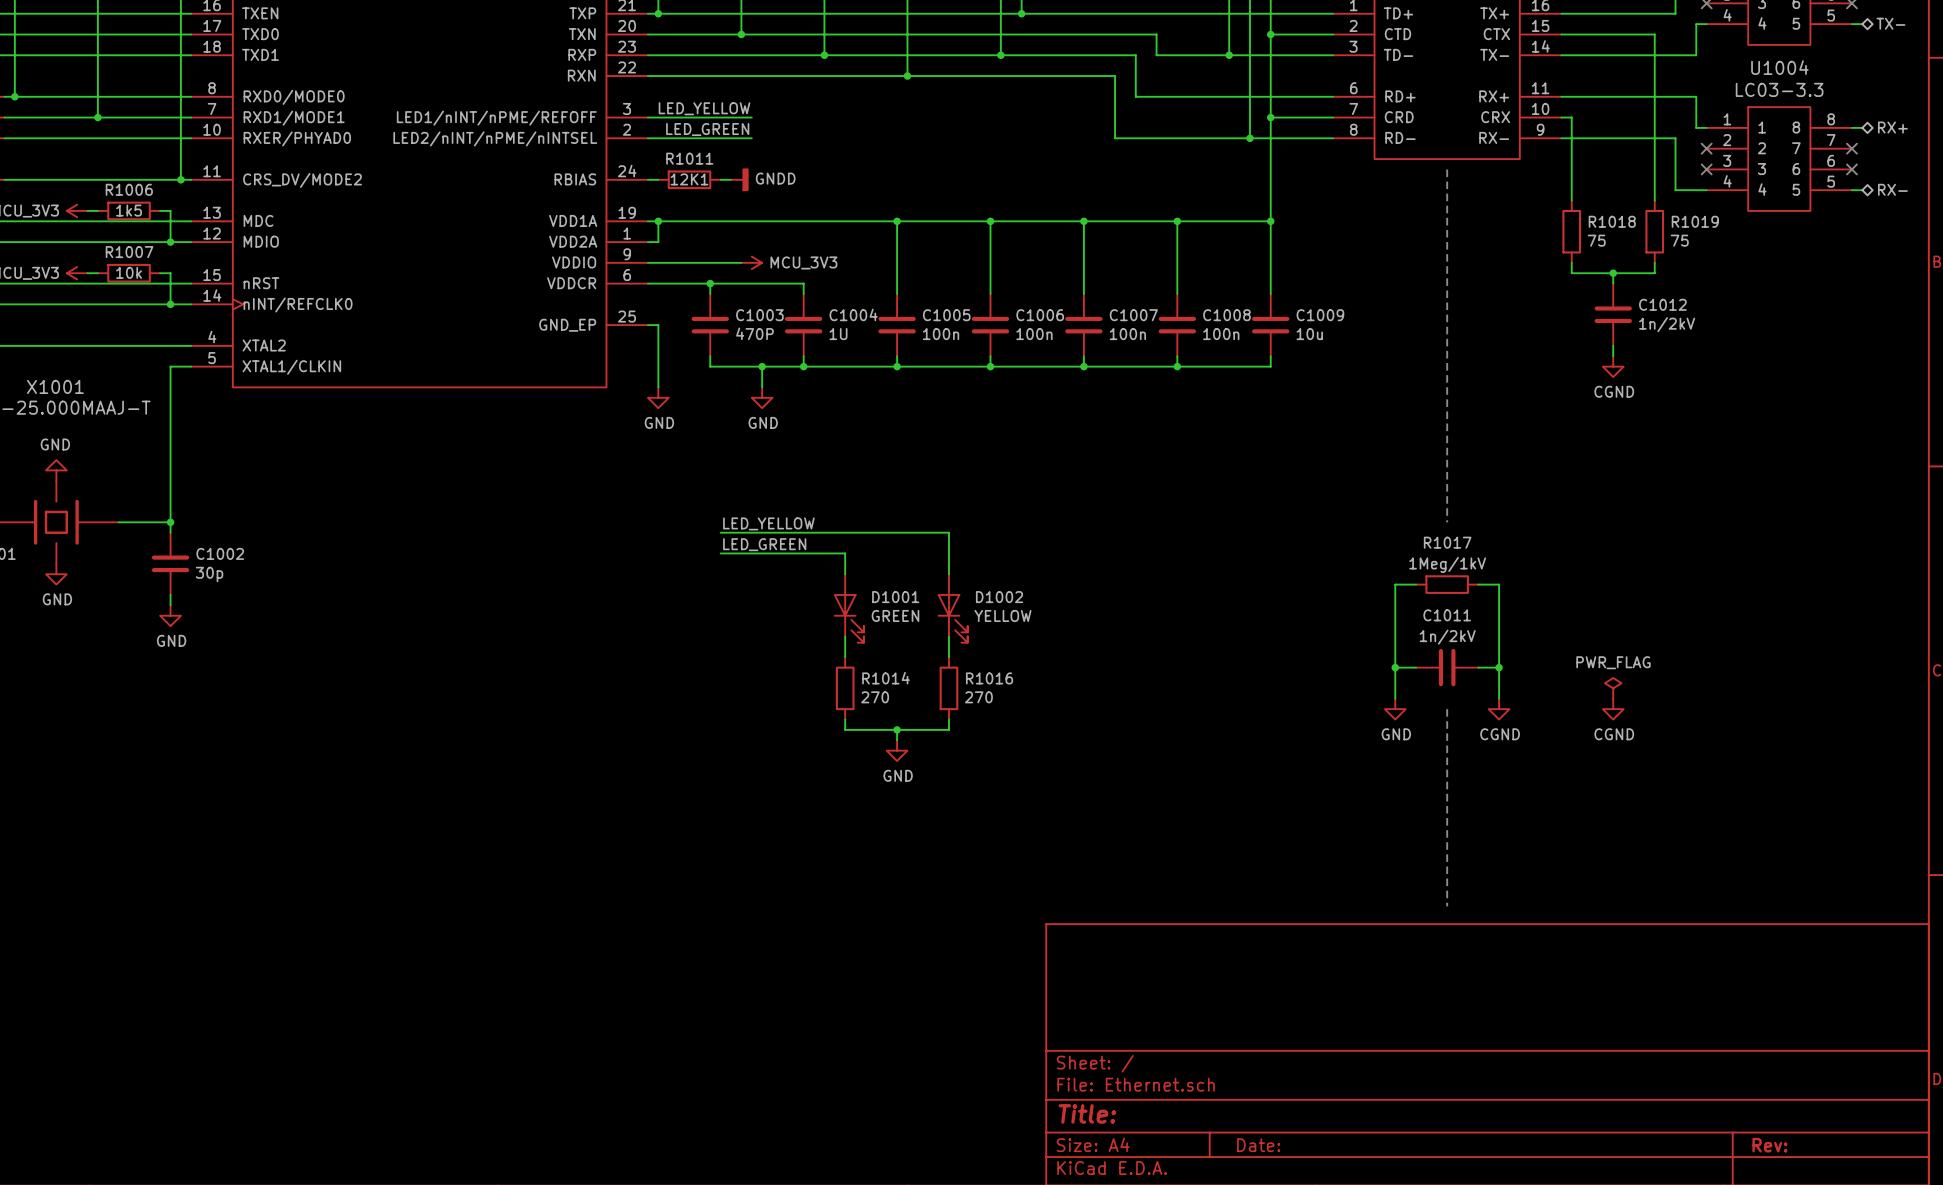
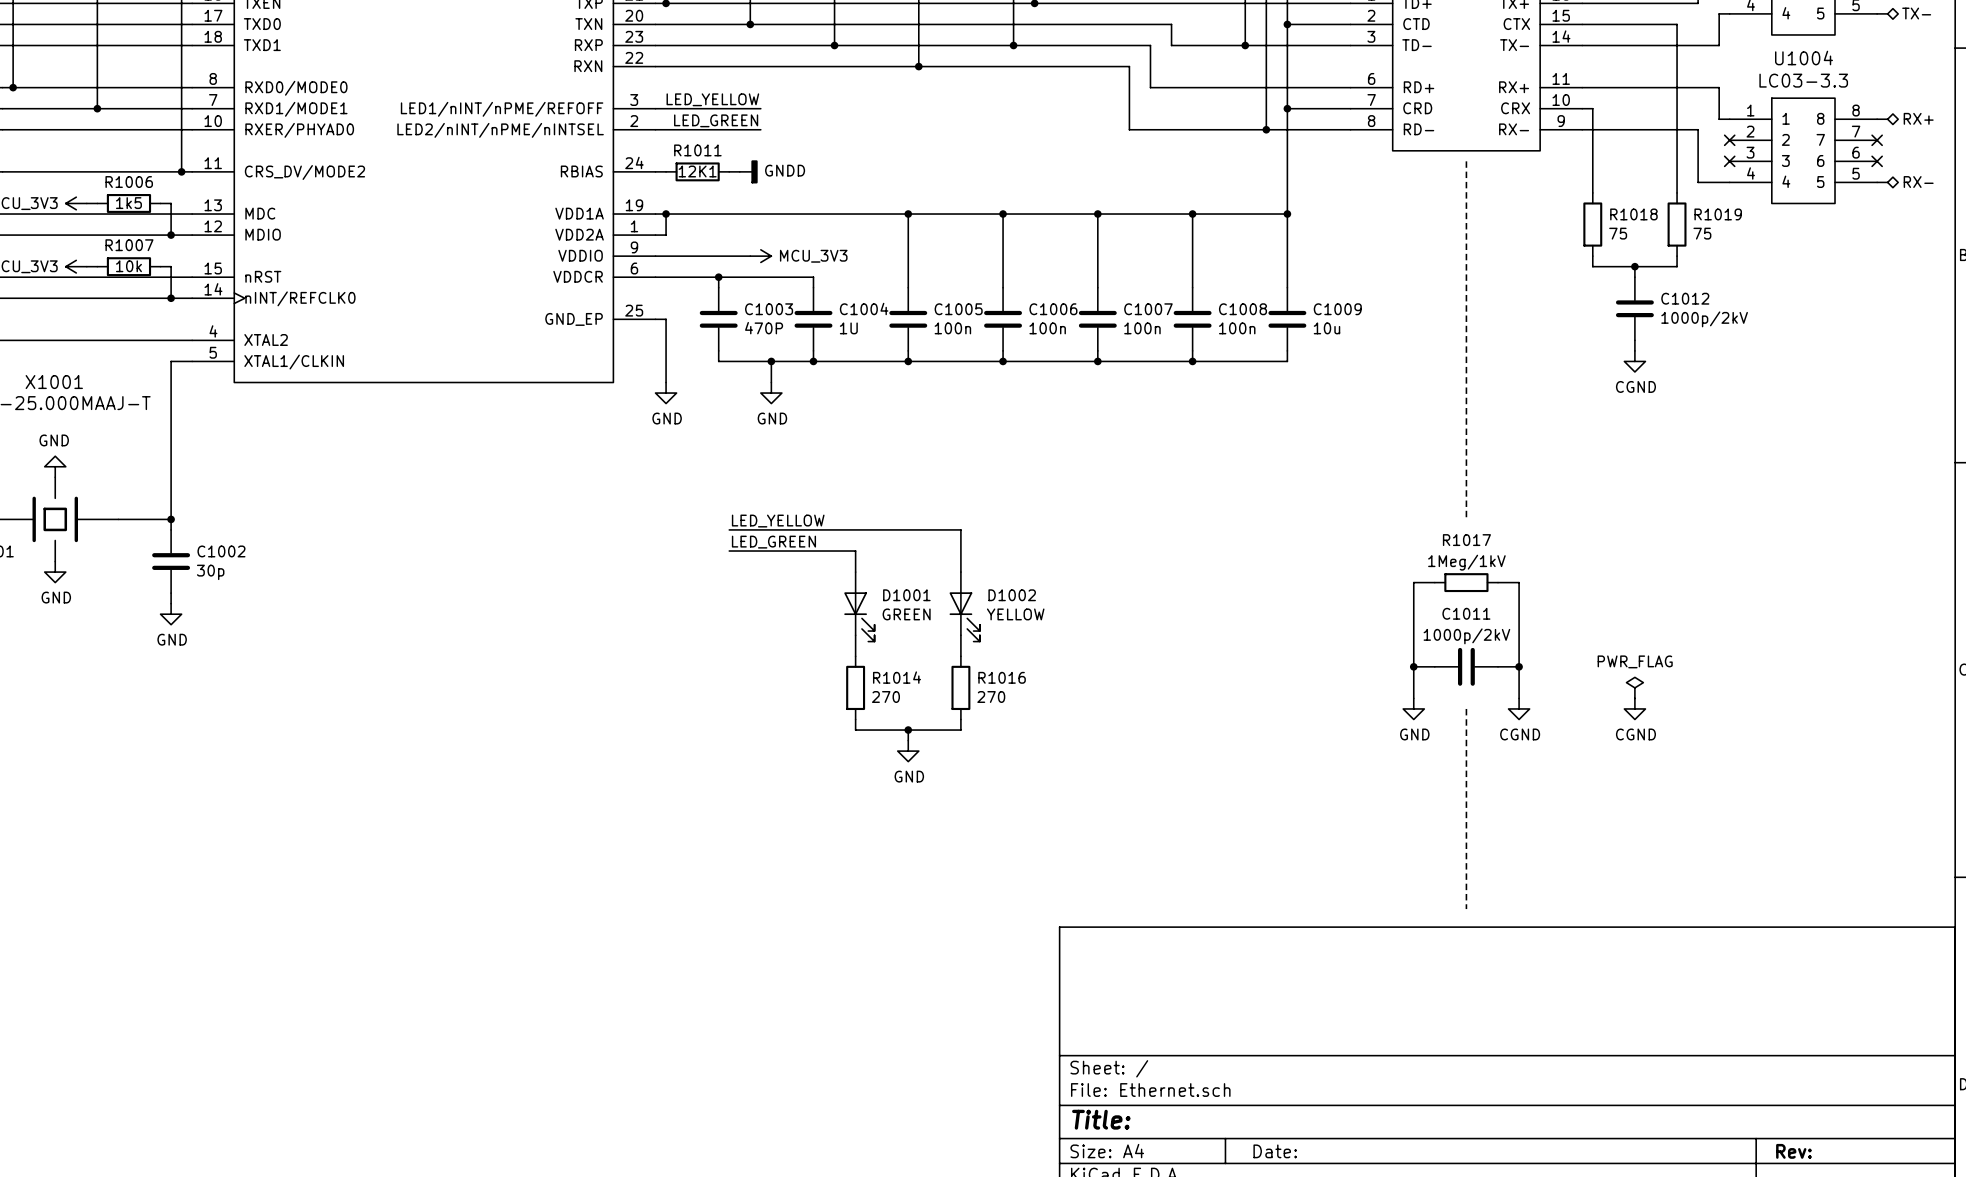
C1012 value: 1n/2kV (1667, 324) -> 1000p/2kV (1704, 319)
C1011 value: 1n/2kV (1447, 637) -> 1000p/2kV (1466, 636)

